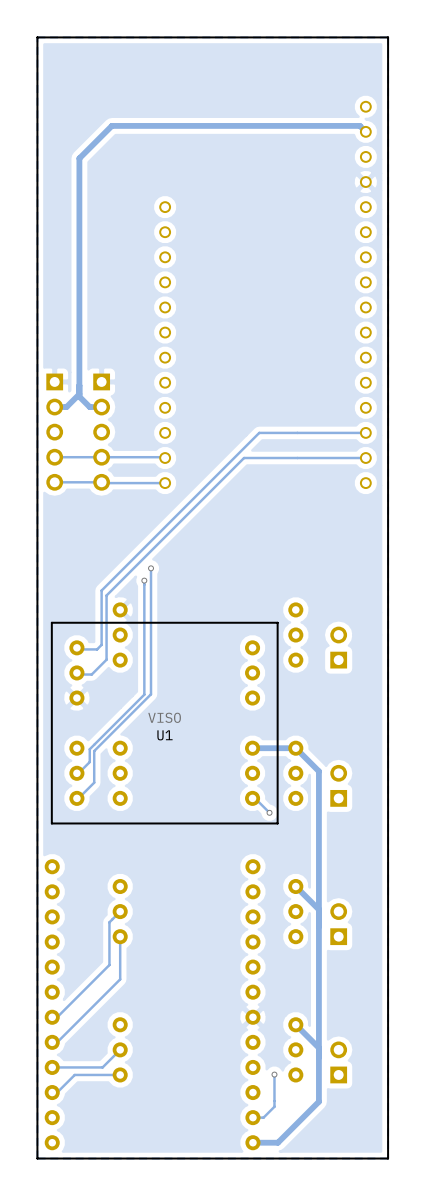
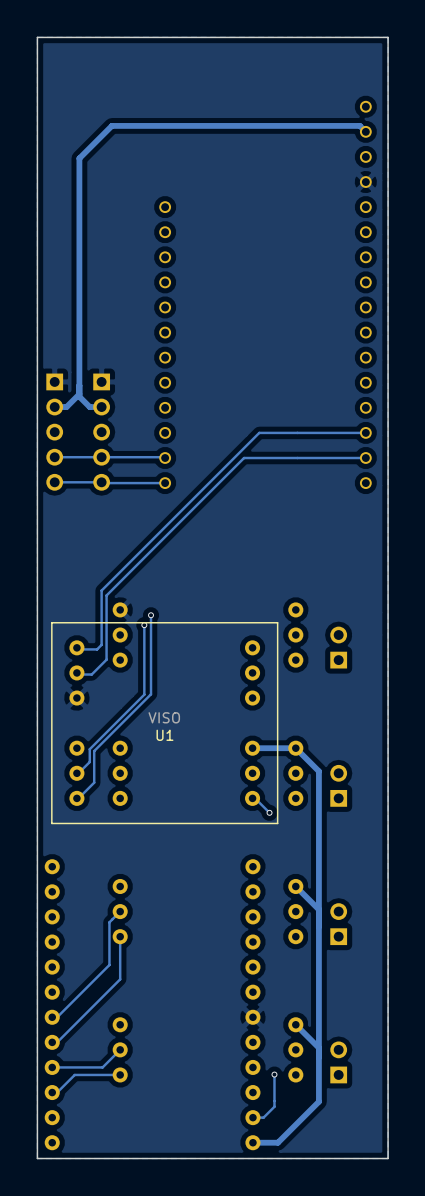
track: (151, 568) (151, 615) -> none
via: (151, 568) -> none
track: (144, 580) (144, 625) -> none
via: (144, 580) -> none
via: none -> (151, 615)
via: none -> (144, 625)

